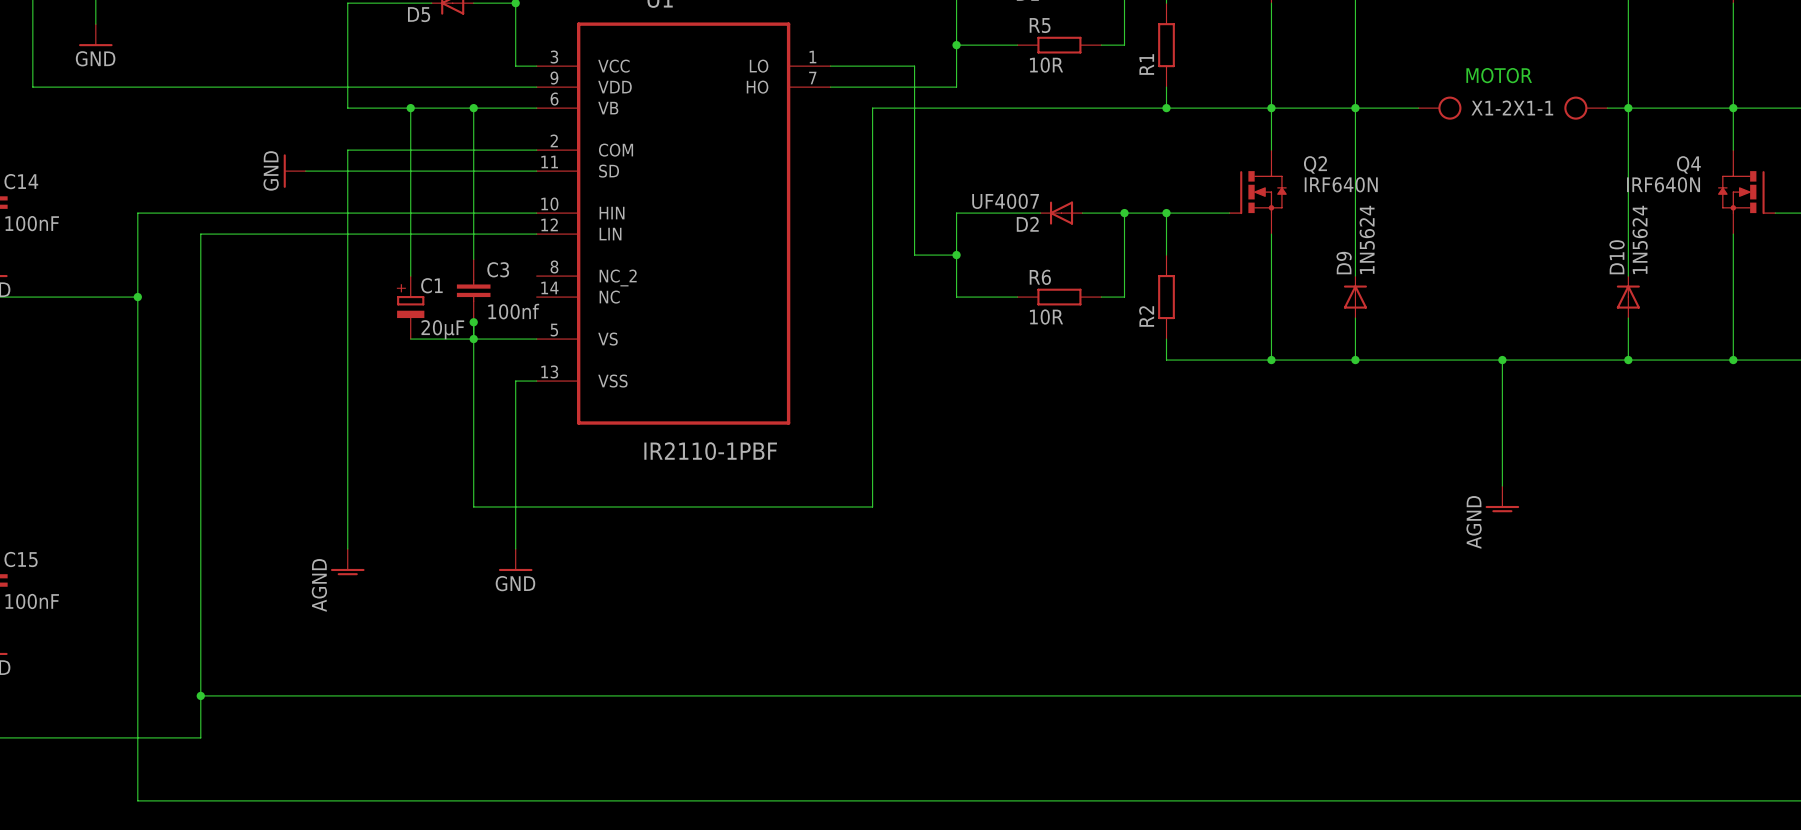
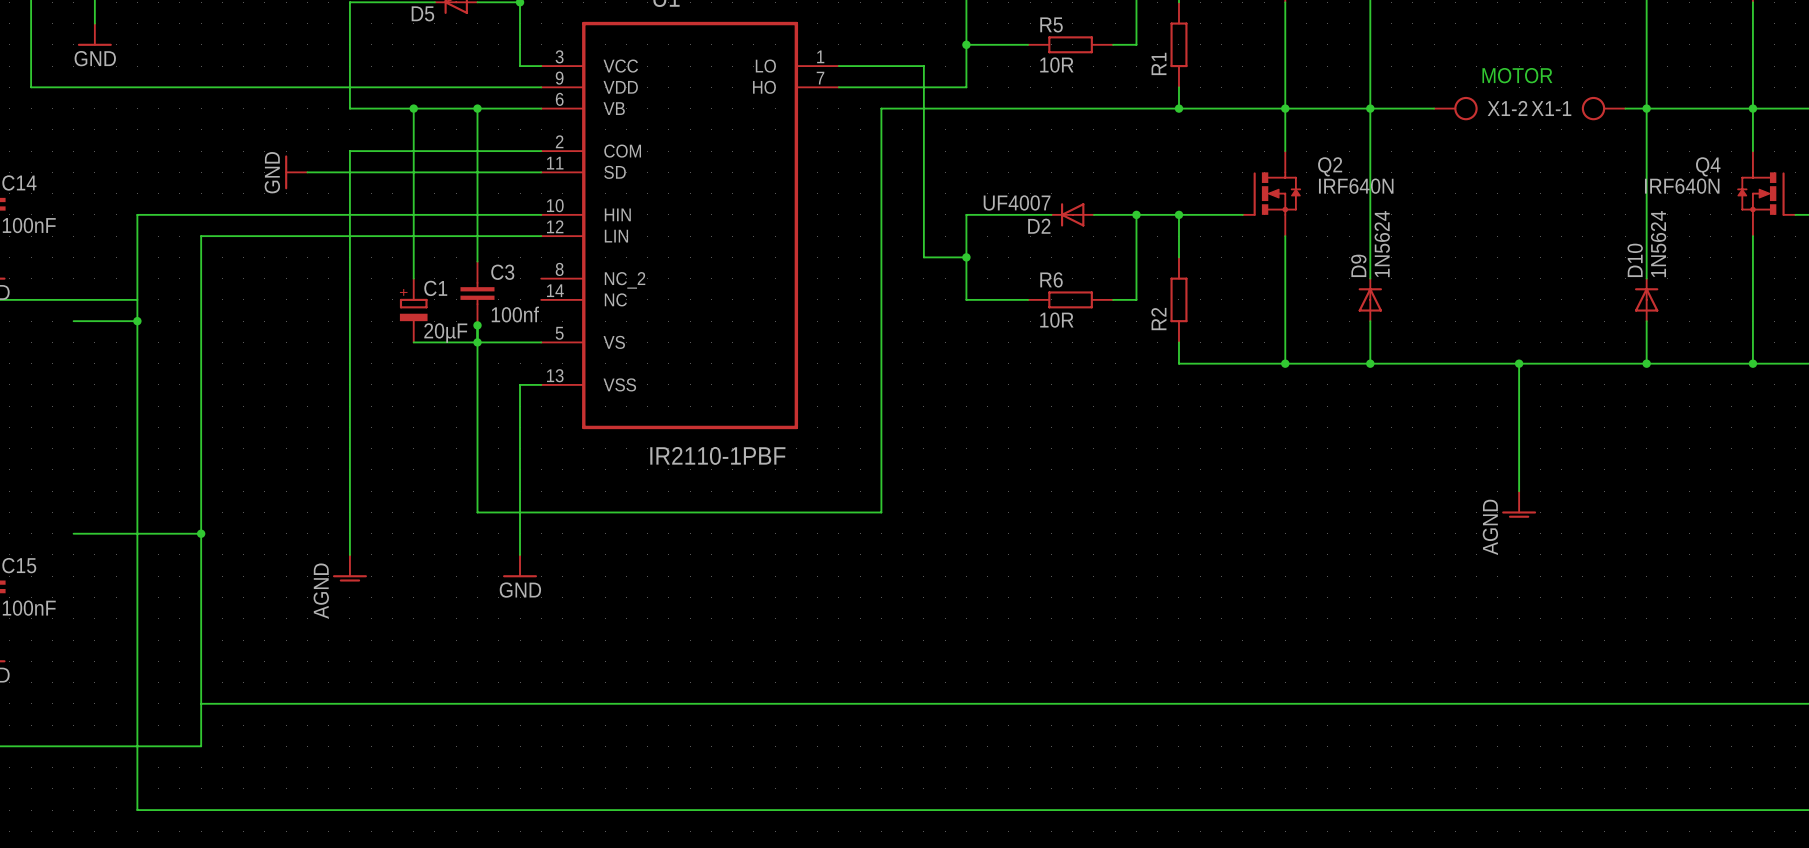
junction position: (137, 297) -> (137, 321)
wire: none -> (73, 321) (137, 321)
wire: none -> (73, 533) (201, 533)
junction: none -> (201, 533)
junction: (200, 695) -> none

